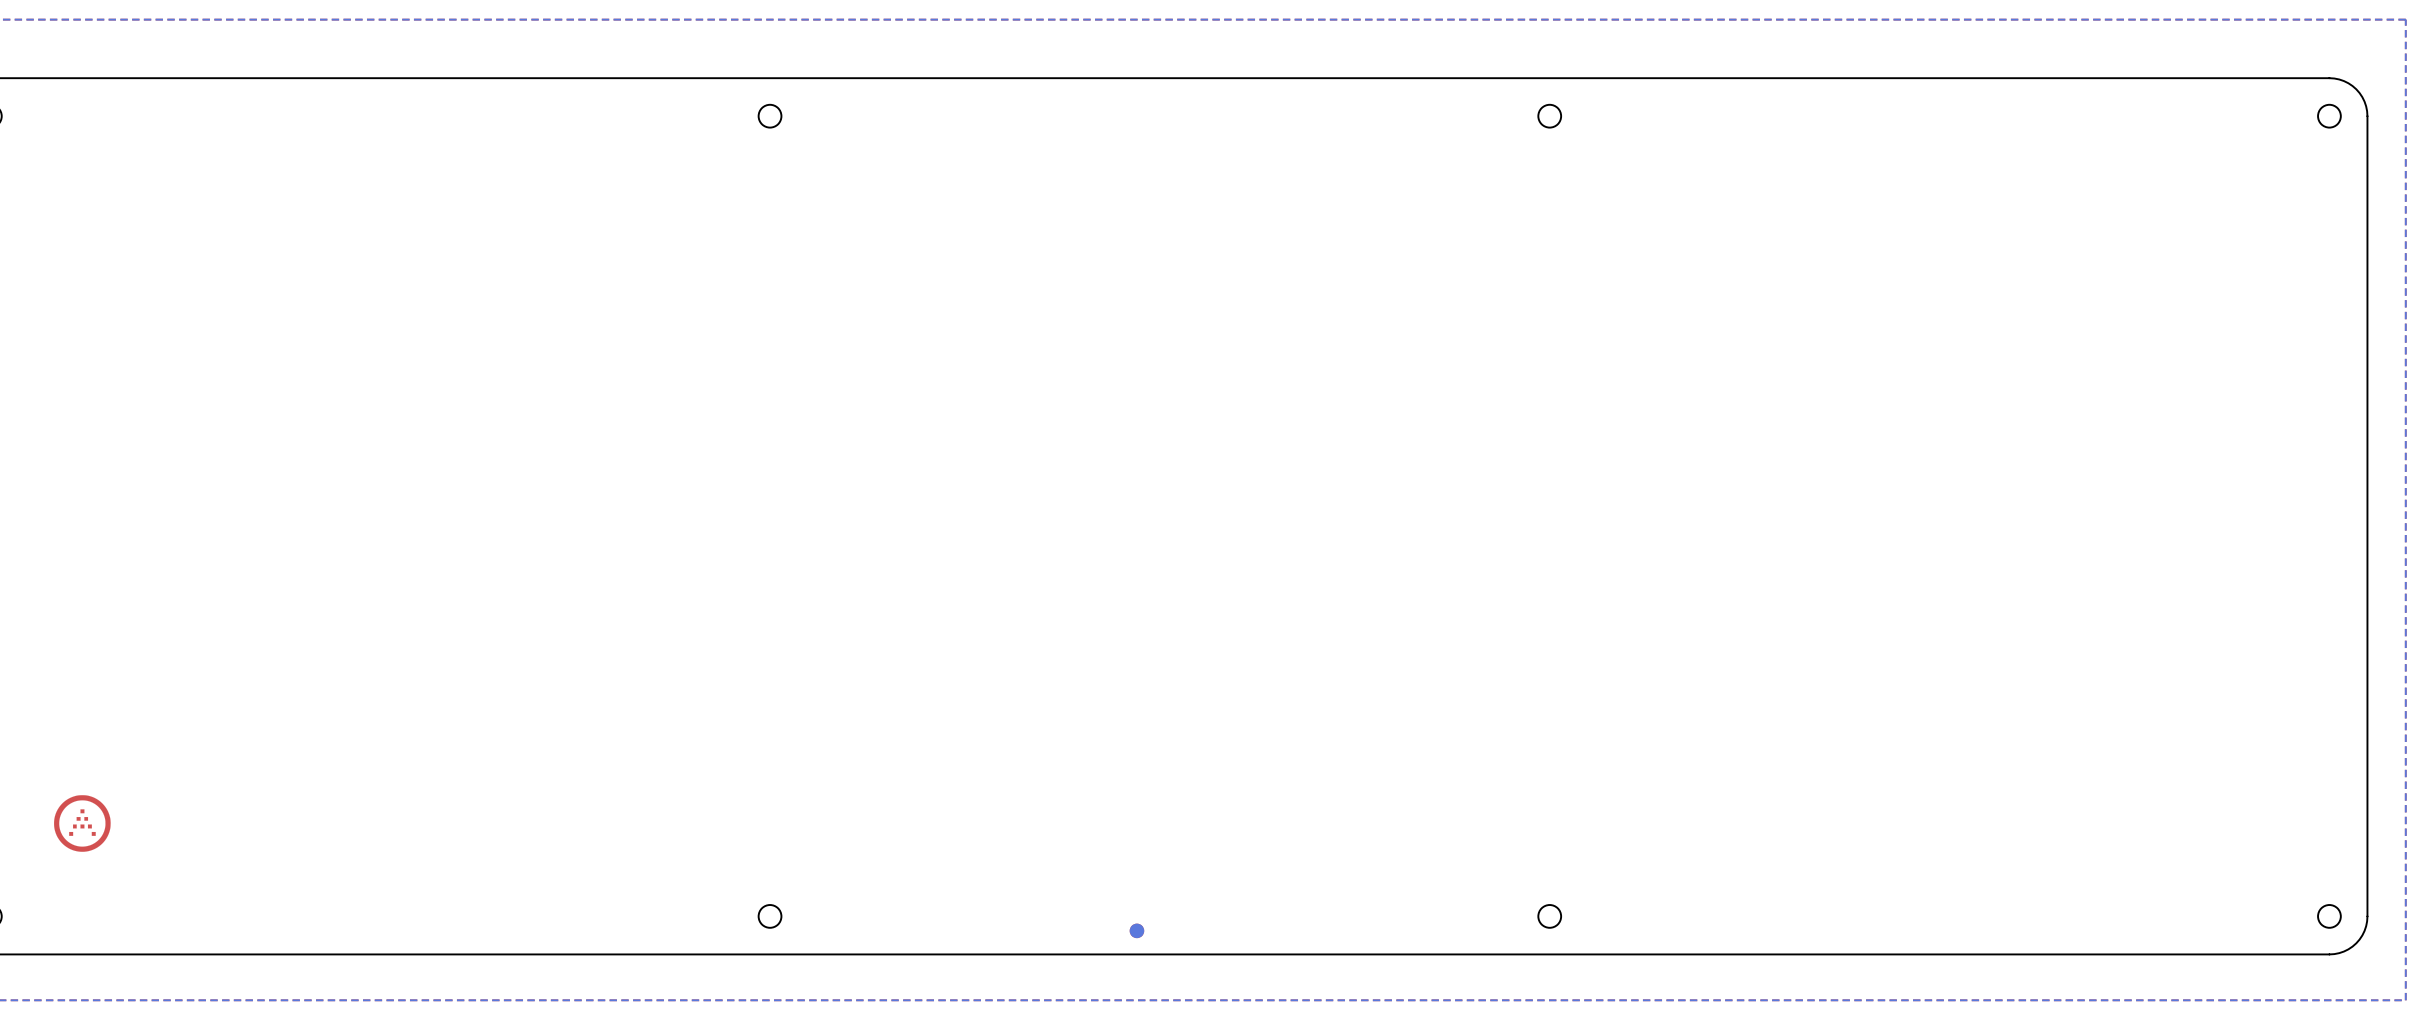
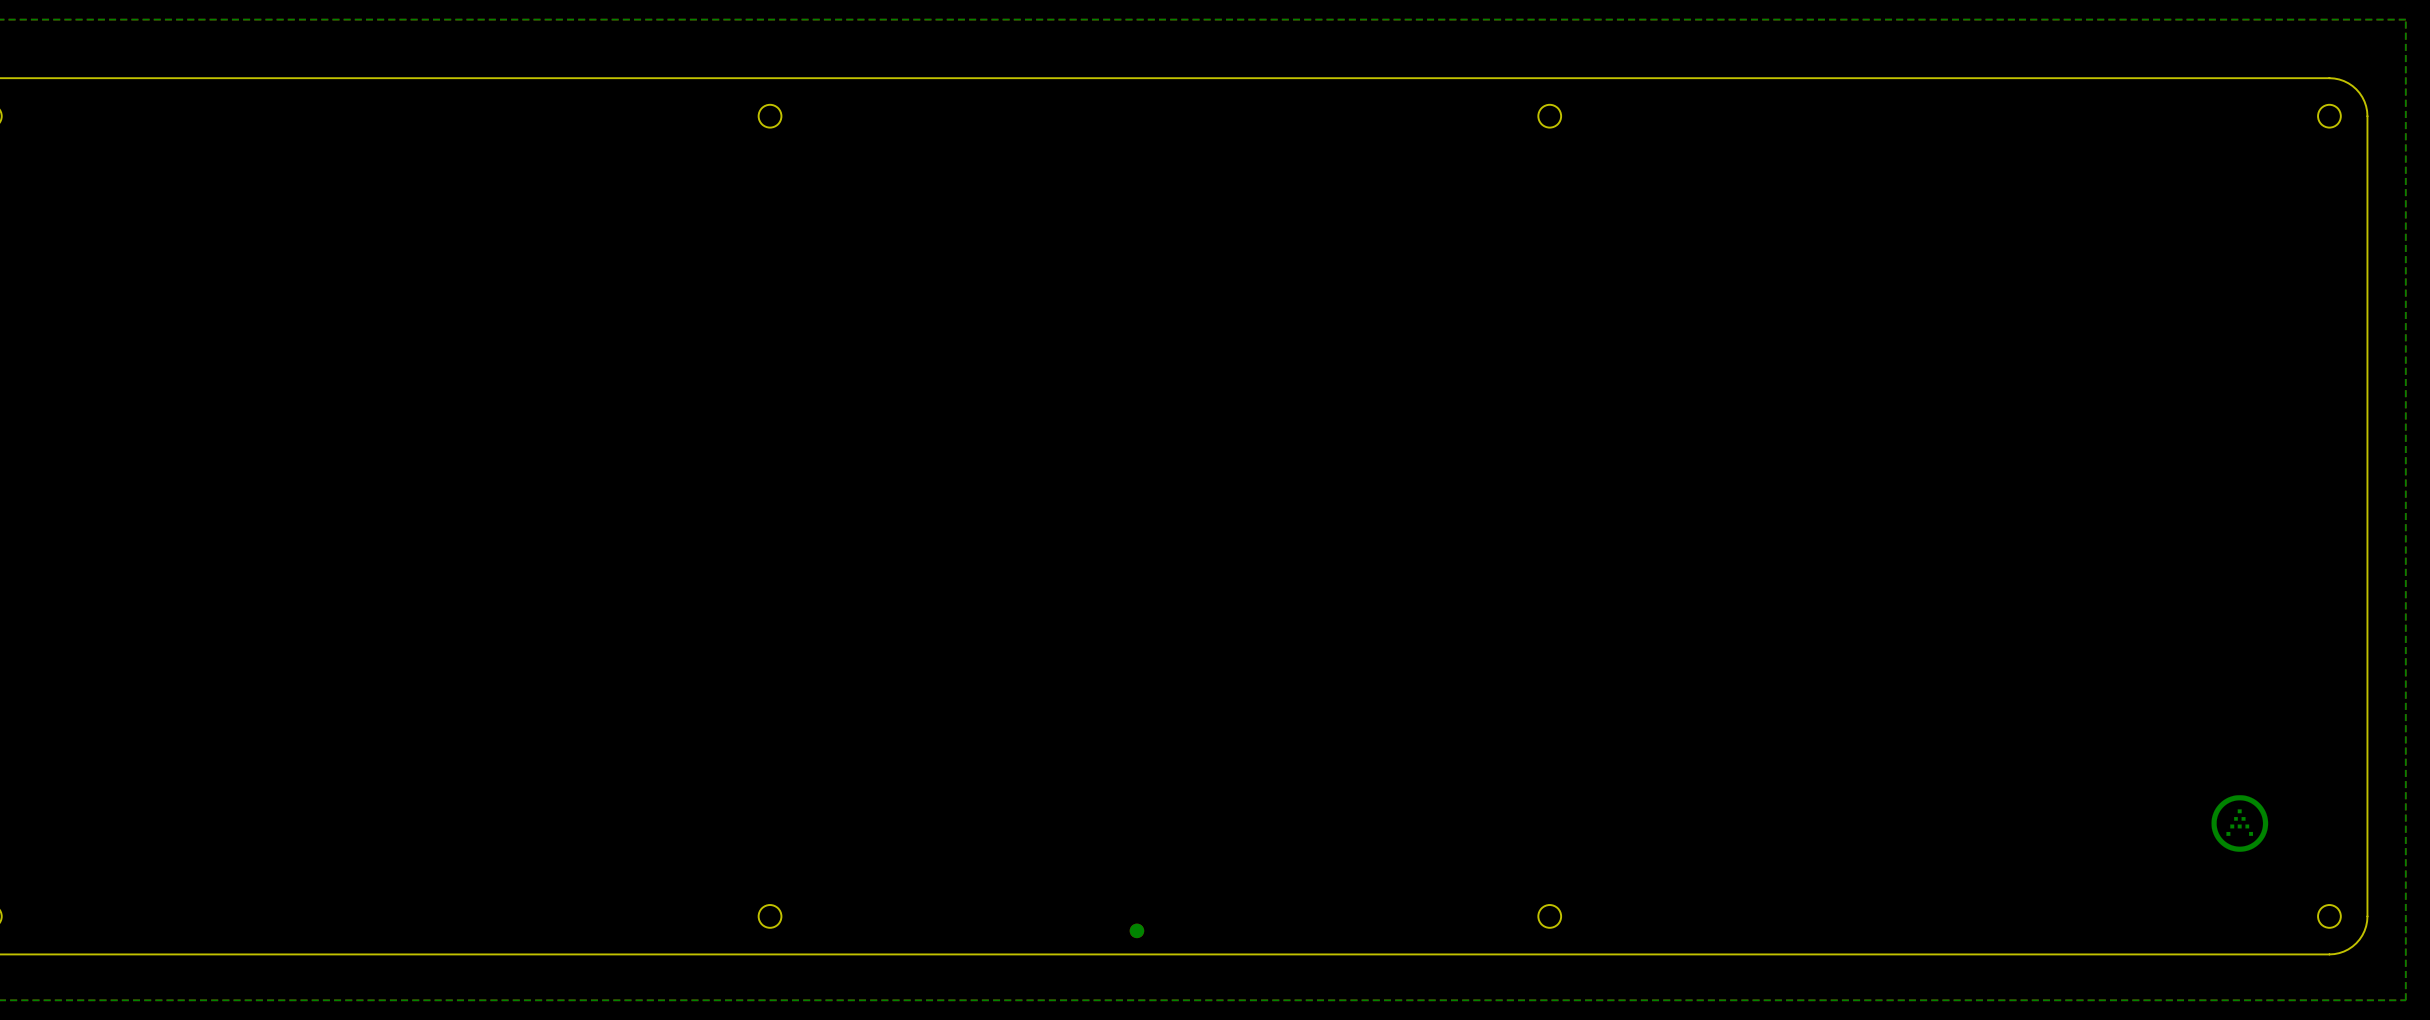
drawing: [54, 795, 111, 852] -> none
drawing: none -> [2211, 795, 2269, 852]

